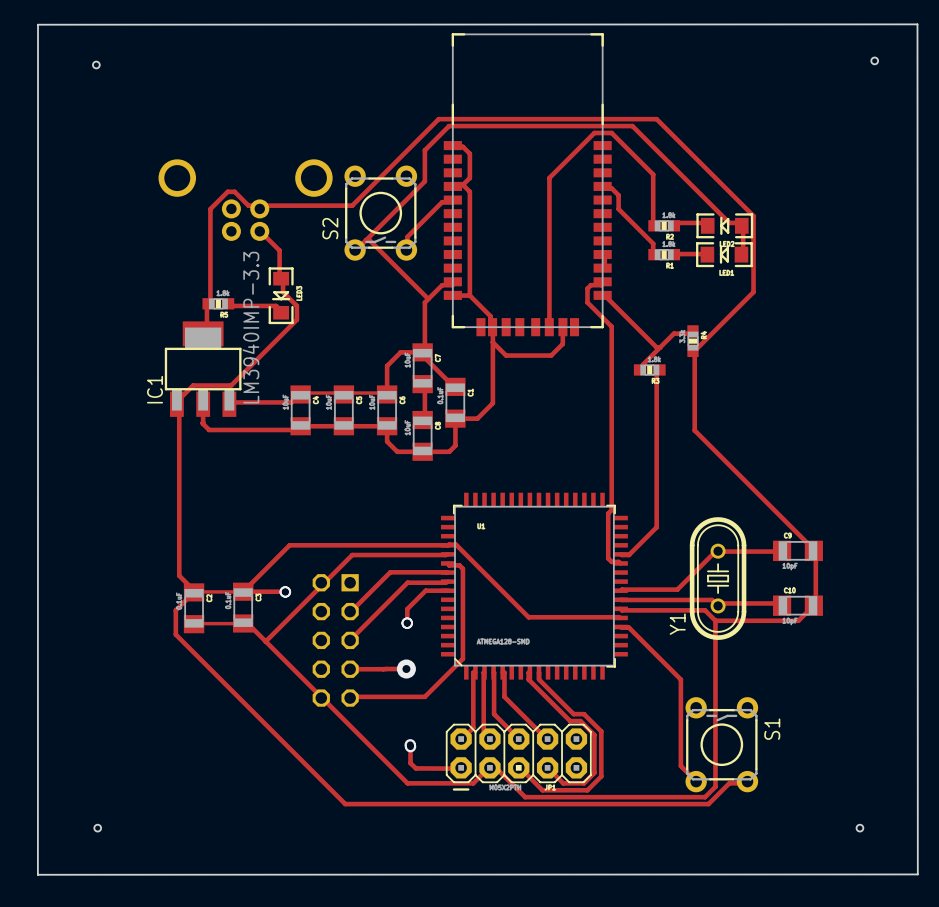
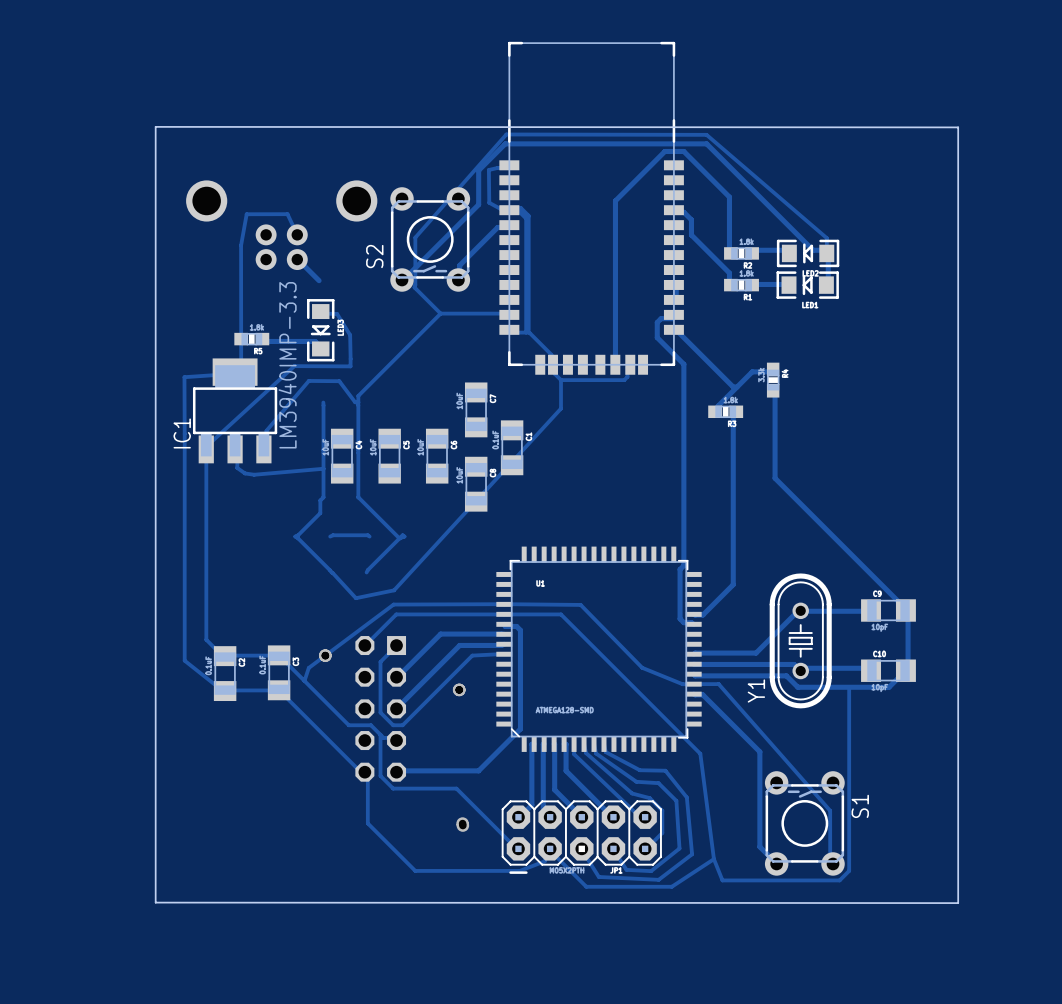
board edge: (917, 24) (917, 874) (37, 874) (38, 24) (917, 24) -> (155, 126) (155, 902) (958, 903) (958, 127) (155, 126)
hole: (874, 60) -> none
hole: (96, 64) -> none
track: (452, 145) (462, 146) (469, 153) (469, 177) (462, 184) -> (509, 165) (507, 167) (488, 169) (489, 202) (500, 209) (507, 209) (510, 212) (519, 212) (526, 218) (526, 332)
track: none -> (297, 234) (287, 214) (246, 214) (241, 245) (241, 338)
track: none -> (826, 253) (826, 238) (706, 134) (506, 134) (415, 237) (414, 287) (440, 313)
track: (366, 240) (369, 240) (428, 299) -> none
track: (279, 250) (279, 278) (283, 281) (283, 292) (296, 305) (296, 319) (231, 385) (193, 385) (175, 402) (179, 406) (179, 575) (194, 592) (175, 610) (175, 634) (345, 804) (708, 804) (729, 783) (746, 783) (747, 781) -> (504, 604) (580, 604) (642, 667) (682, 684) (718, 684) (830, 810) (830, 861) (833, 863)
track: none -> (323, 313) (337, 313) (350, 335) (350, 366) (294, 366) (206, 446) (206, 639) (222, 655) (225, 656)
track: none -> (440, 313) (358, 395) (358, 402)
track: (452, 281) (452, 285) (442, 285) (424, 302) (424, 350) (422, 352) -> (509, 314) (440, 313)
track: (452, 295) (469, 295) (490, 316) (490, 326) (492, 327) (492, 403) (477, 418) (455, 418) -> (509, 329) (510, 332) (529, 332) (551, 354) (551, 364) (554, 367) (554, 373) (561, 380)
track: none -> (241, 339) (241, 367) (234, 373) (184, 377) (184, 660) (225, 691)
track: (562, 327) (562, 343) (551, 355) (506, 355) (492, 342) -> (630, 364) (627, 367) (627, 376) (624, 380) (561, 380)
track: (203, 333) (206, 330) (206, 305) (210, 302) (210, 209) (227, 191) (234, 191) (248, 205) (258, 205) (259, 208) (262, 205) (352, 205) (438, 119) (656, 119) (753, 216) (753, 292) (694, 350) -> none
track: none -> (561, 380) (561, 408) (394, 590) (355, 598) (295, 536) (320, 513) (320, 500) (323, 497) (323, 402)
track: (422, 352) (400, 352) (387, 365) (387, 394) (300, 393) (291, 402) (230, 402) (229, 404) -> (358, 402) (355, 402) (339, 381) (308, 380) (266, 430) (266, 446) (263, 449)
track: (422, 352) (421, 354) (455, 386) -> none
track: none -> (358, 402) (358, 497)
track: (422, 384) (424, 385) (424, 416) (422, 420) -> none
track: (203, 404) (202, 423) (209, 429) (296, 429) (300, 426) (387, 426) (387, 441) (397, 451) (449, 451) (455, 445) (455, 418) -> (235, 449) (238, 449) (237, 467) (245, 473) (254, 474) (323, 468)
track: none -> (358, 497) (399, 538) (404, 536) (402, 535) (367, 570) (366, 572)
track: none -> (330, 536) (369, 536)
track: none -> (504, 604) (393, 604) (308, 667) (304, 680)
track: (448, 554) (352, 555) (324, 582) (321, 582) (321, 586) (265, 641) -> none
track: none -> (364, 645) (396, 614) (561, 614) (700, 753) (713, 859)
track: (448, 590) (425, 590) (407, 609) (407, 623) -> (504, 654) (472, 655) (402, 725) (393, 725) (380, 712) (380, 661) (396, 645)
track: (285, 591) (243, 591) (289, 545) (456, 544) (528, 617) (620, 617) -> none
track: (715, 620) (715, 786) (705, 797) (525, 797) (497, 769) (489, 767) (473, 783) (407, 783) (245, 620) (243, 623) -> (713, 859) (671, 886) (586, 886) (550, 848) (544, 861) (519, 870) (415, 870) (367, 823) (367, 772) (364, 772) (364, 769) (358, 769) (279, 690)
track: none -> (849, 687) (849, 870) (839, 880) (722, 880) (713, 859)
track: (406, 669) (350, 669) -> (279, 655) (348, 725) (371, 725) (383, 737) (396, 737) (396, 740)
via: (406, 669) -> none
track: none -> (574, 744) (574, 754) (643, 820) (645, 817)
track: none -> (584, 744) (586, 753) (632, 793) (649, 798) (662, 810) (662, 832) (645, 848)
track: (529, 672) (528, 679) (570, 721) (580, 721) (594, 734) (594, 772) (584, 783) (563, 783) (547, 767) -> (594, 744) (596, 753) (636, 781) (658, 783) (676, 800) (679, 848) (651, 871) (626, 869) (613, 848)
track: (538, 672) (539, 679) (573, 714) (584, 714) (601, 731) (601, 776) (587, 790) (542, 790) (518, 767) -> (603, 744) (605, 752) (639, 770) (665, 770) (686, 797) (692, 854) (658, 879) (598, 876) (581, 848)
track: (410, 746) (410, 763) (415, 768) (461, 767) -> (380, 734) (380, 775) (393, 788) (456, 788) (518, 848)
hole: (97, 828) -> none
hole: (859, 828) -> none

